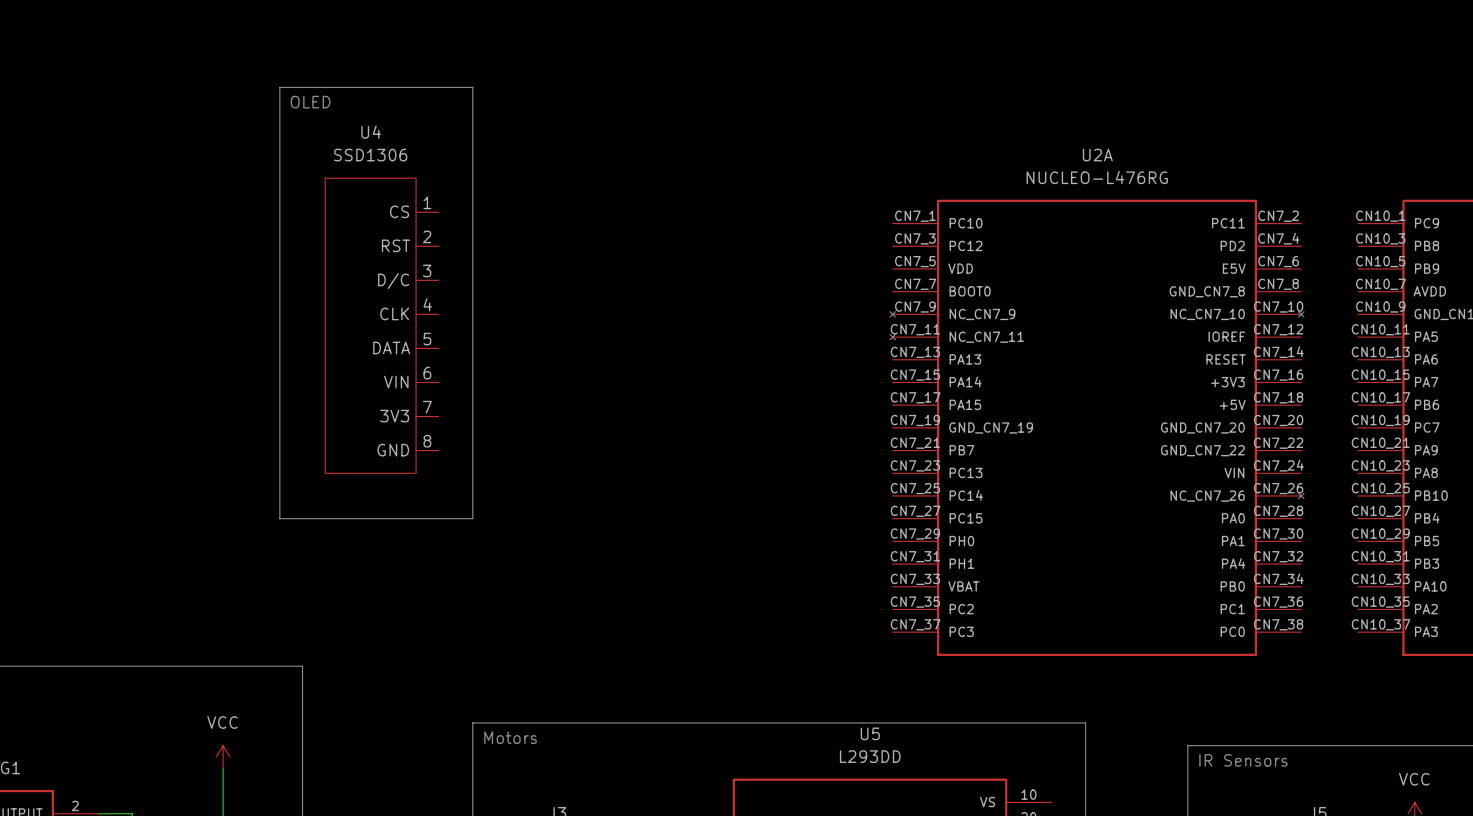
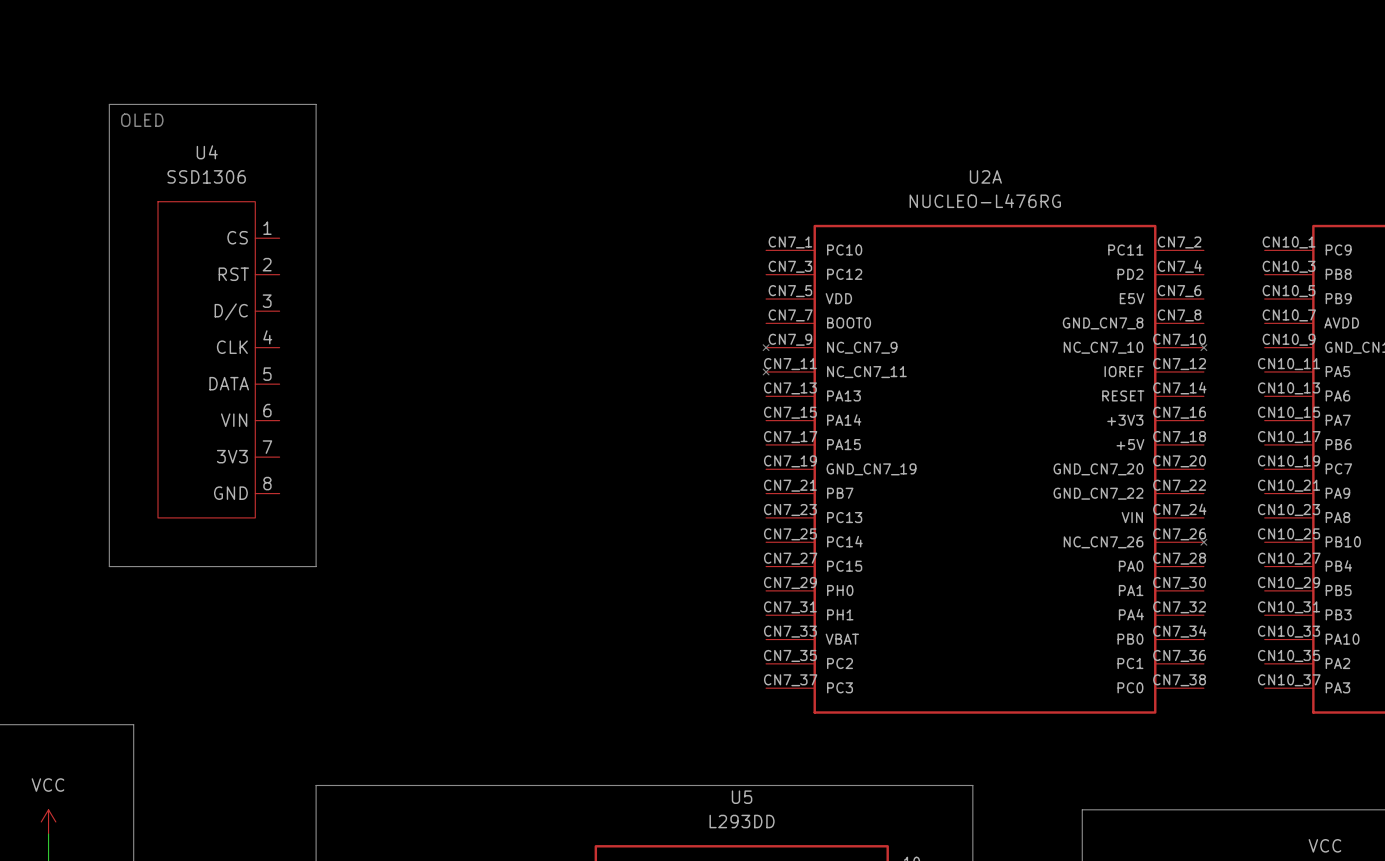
text: Motors (510, 737) -> none
text: IR Sensors (1243, 760) -> none

